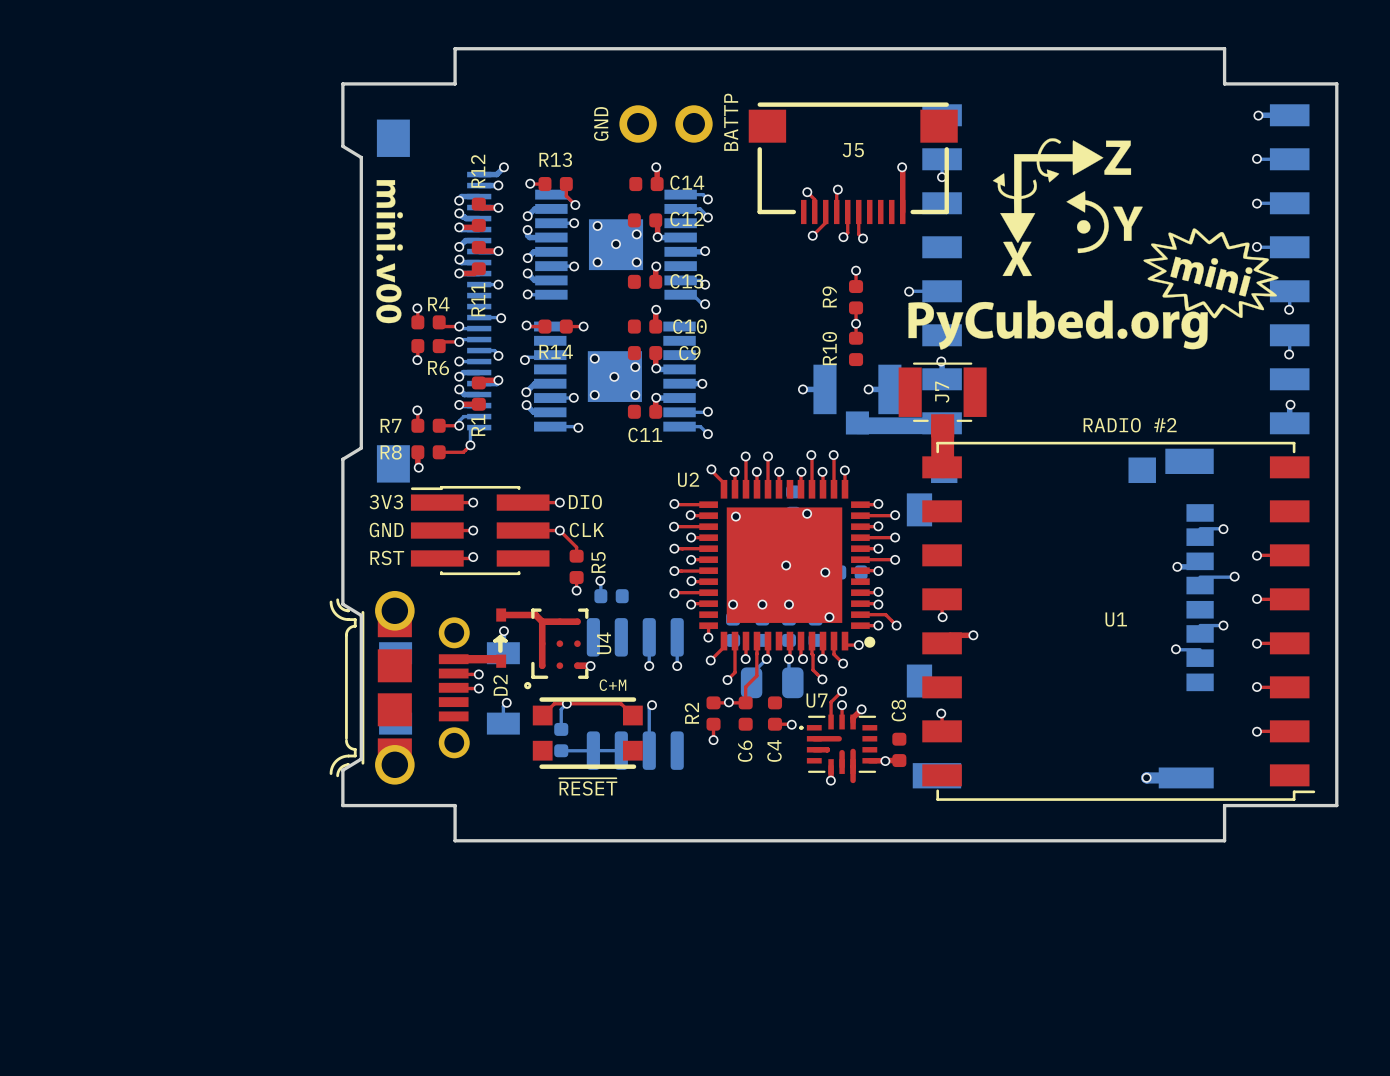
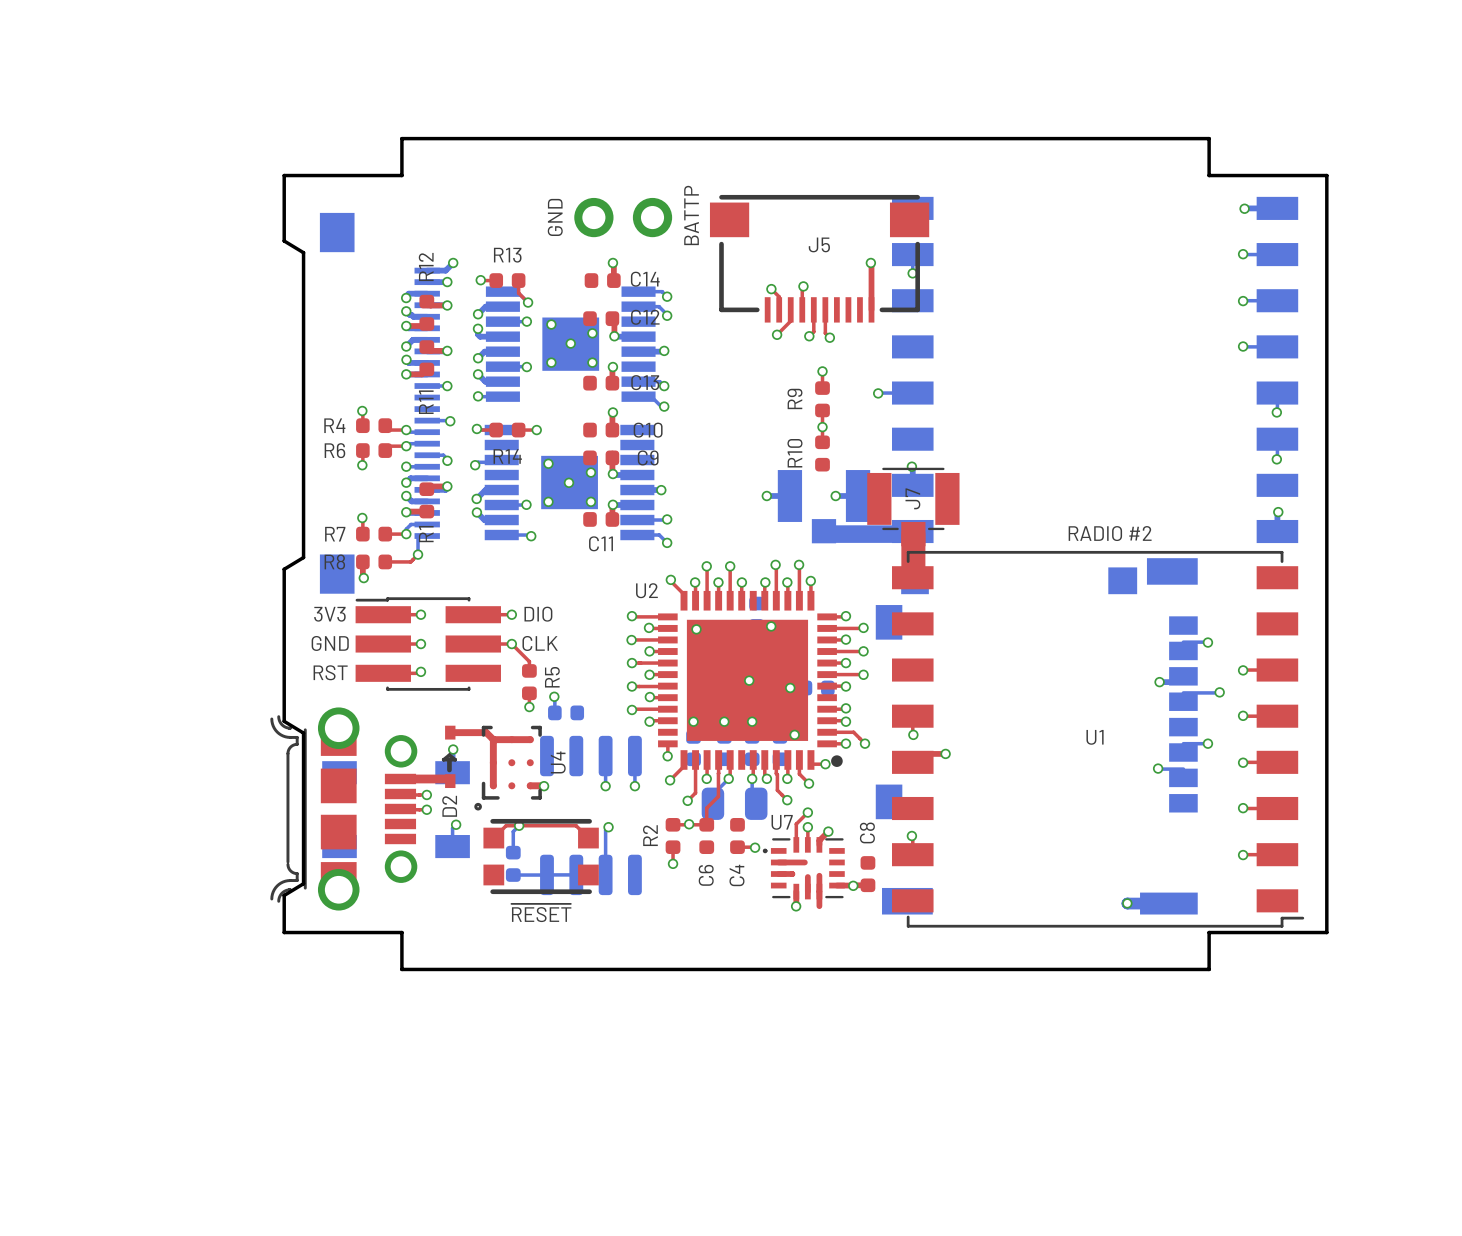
drawing: [908, 138, 1279, 350] -> none
drawing: [376, 180, 404, 324] -> none
R4 name position: R4 (438, 304) -> R4 (334, 425)
R6 name position: R6 (438, 368) -> R6 (334, 450)
text: C+M (612, 685) -> none

